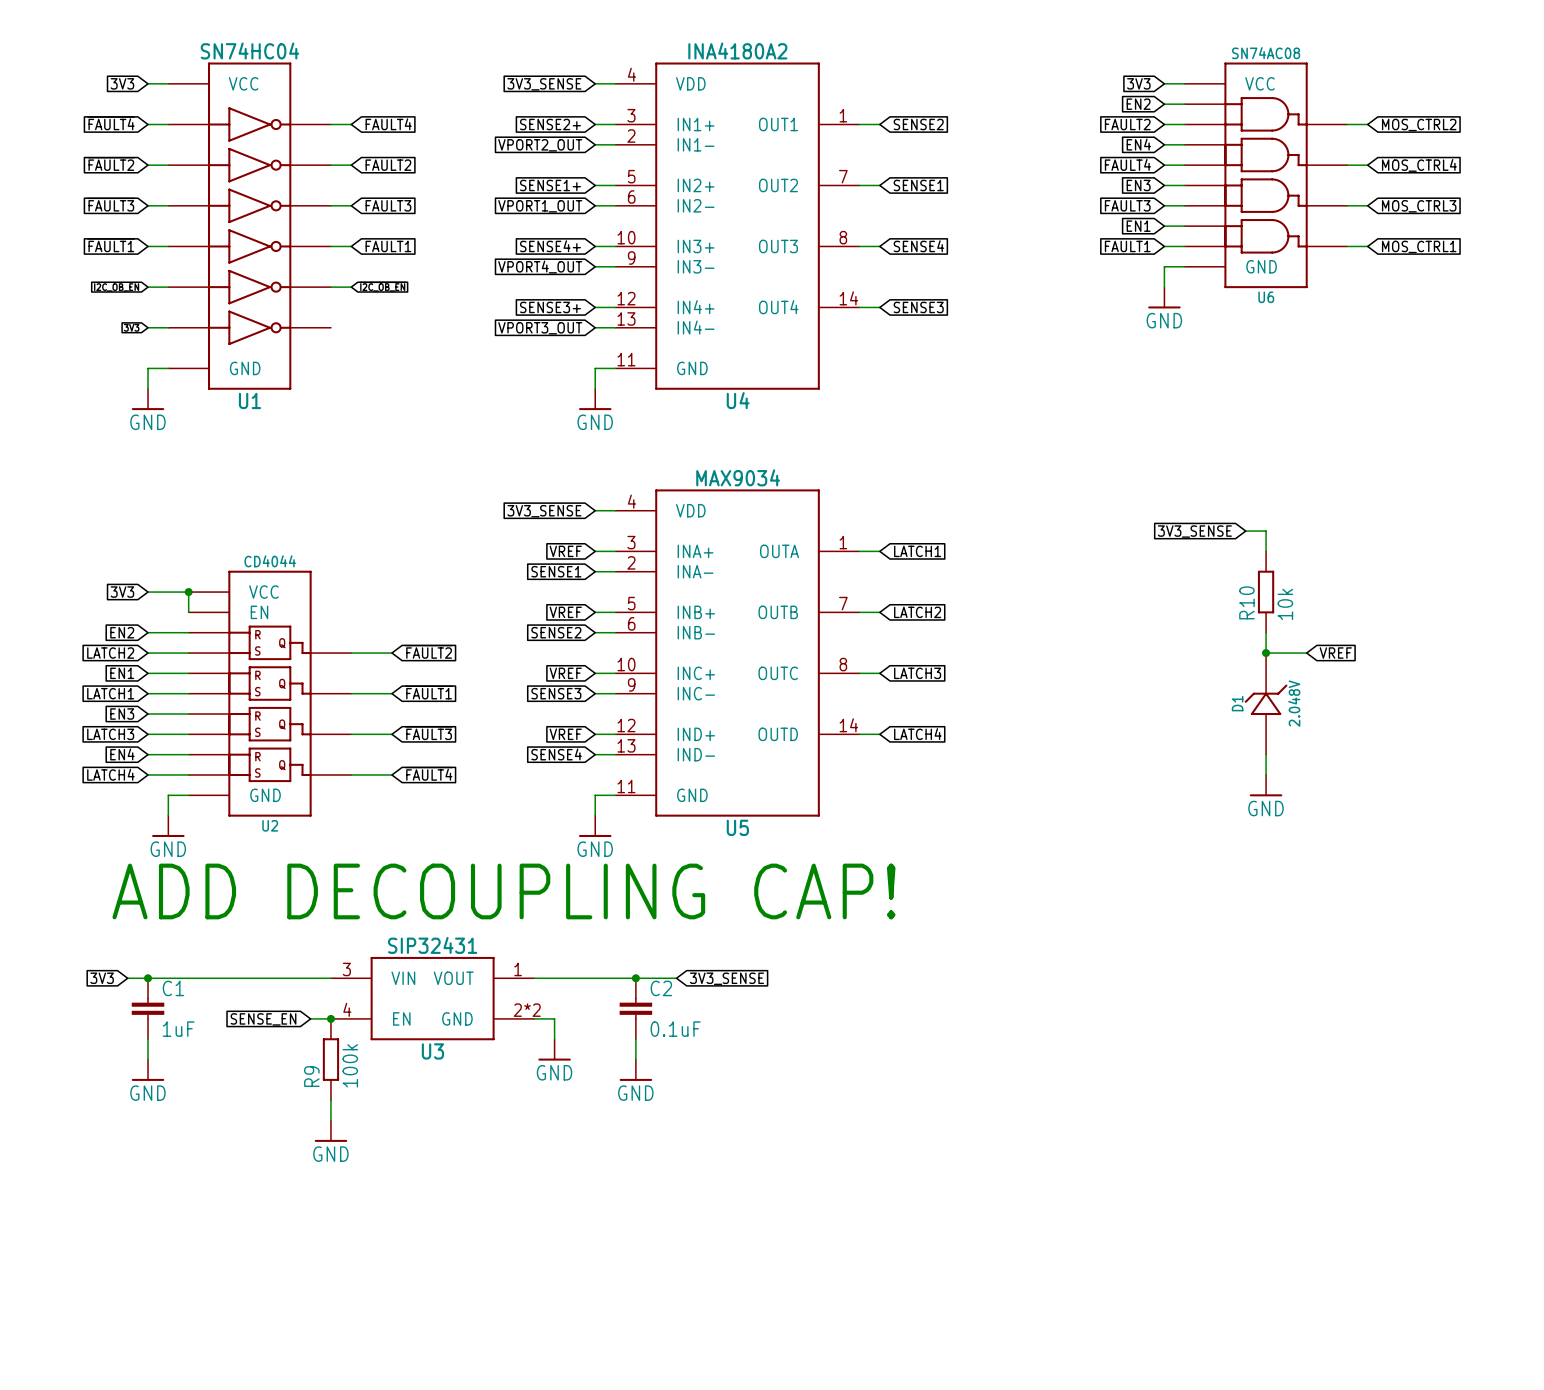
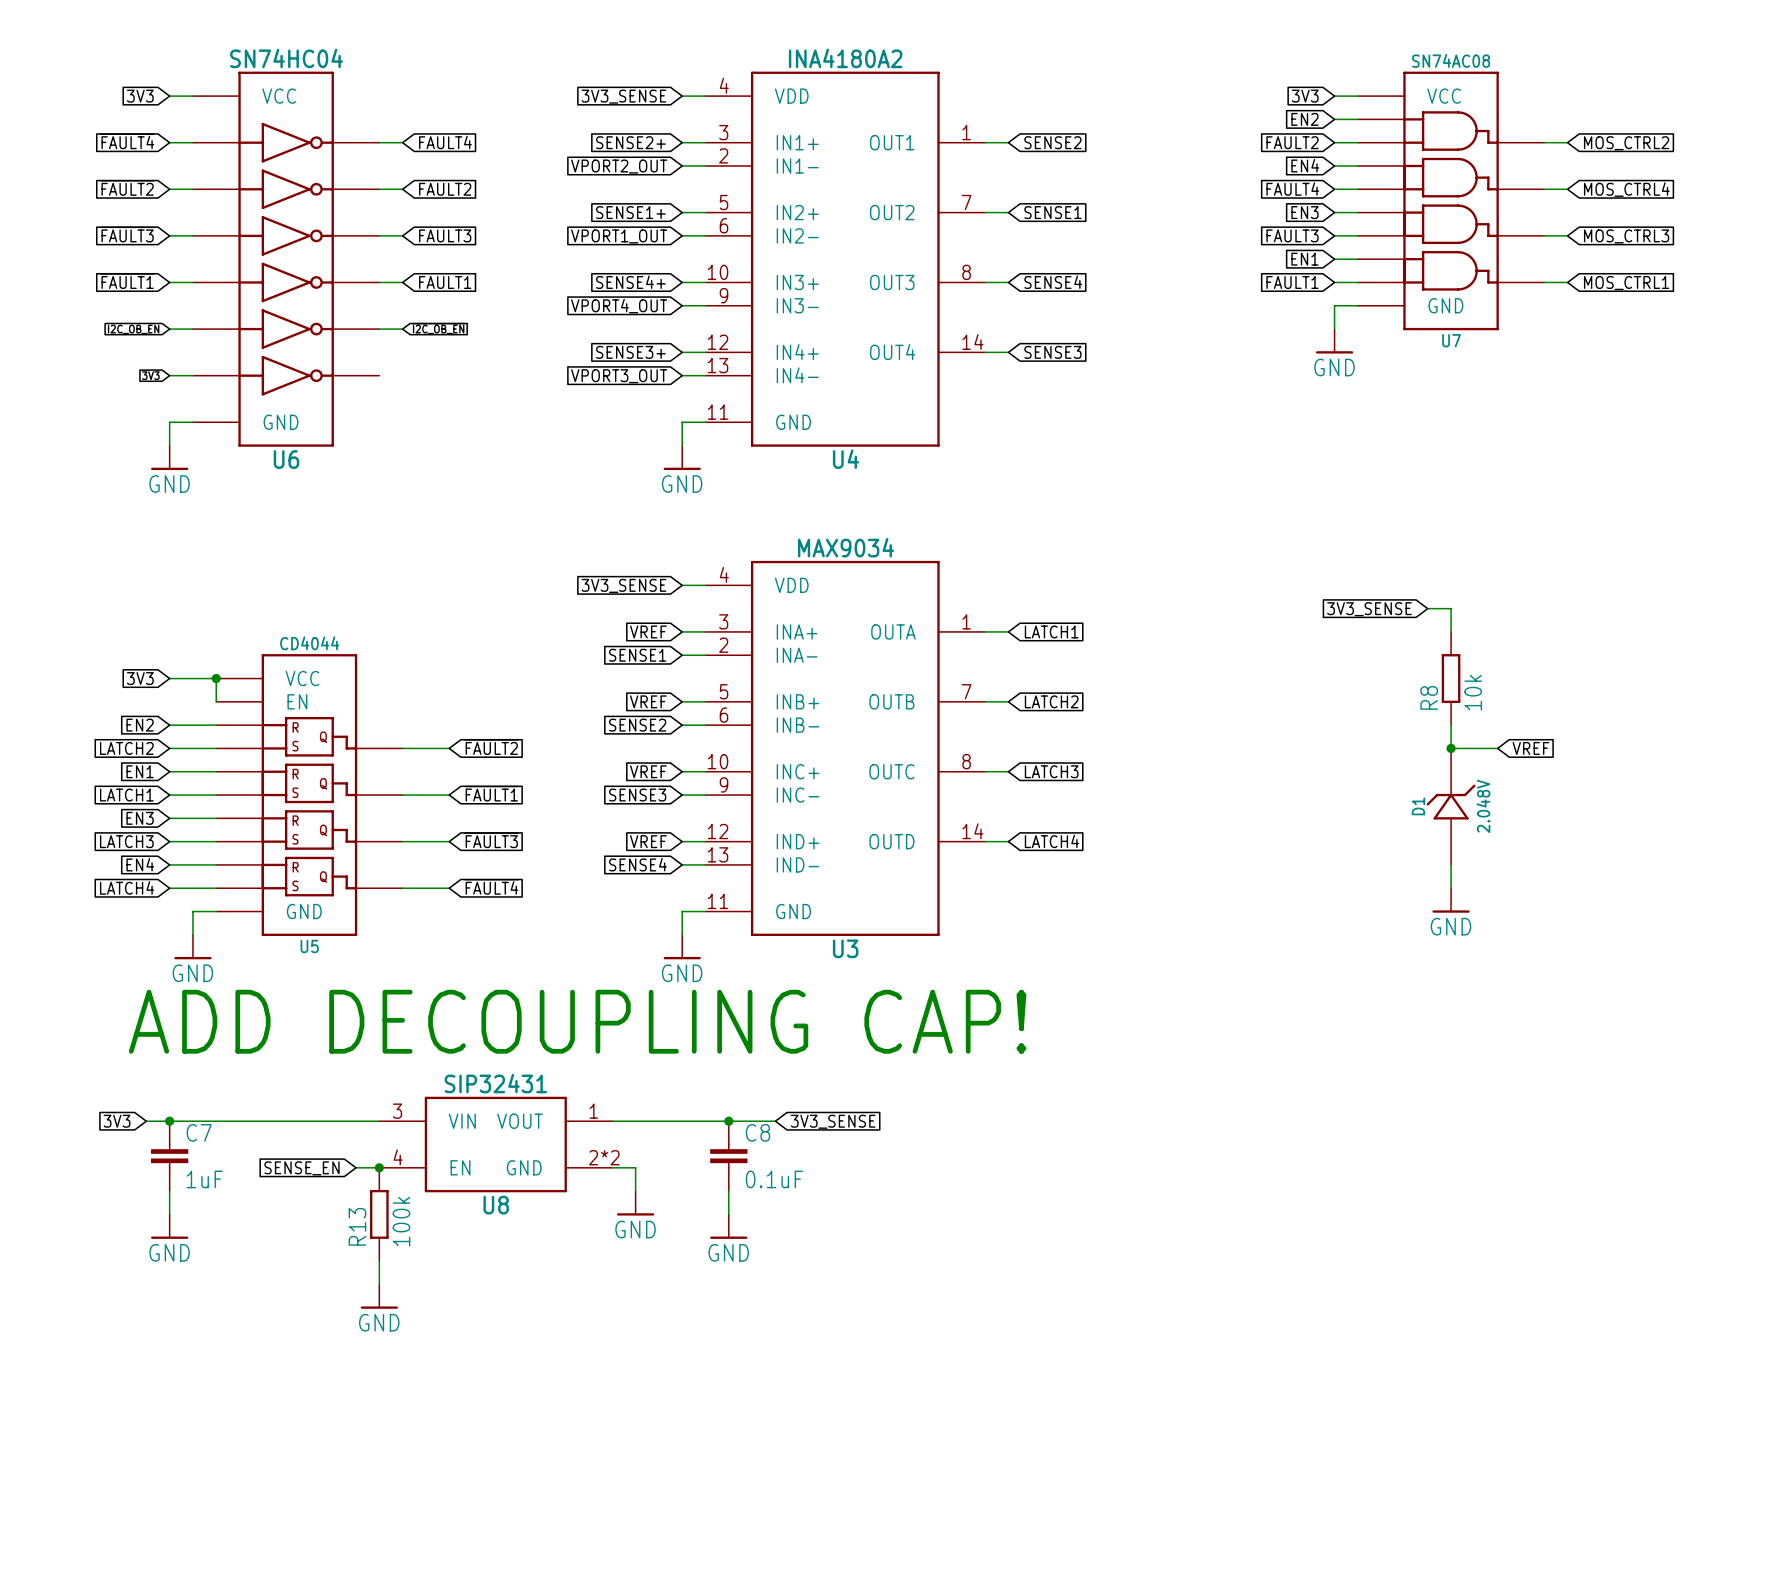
U6 name: U6 (1266, 297) -> U7 (1451, 340)
U1 name: U1 (249, 400) -> U6 (286, 459)
R10 name: R10 (1246, 602) -> R8 (1429, 697)
U2 name: U2 (270, 825) -> U5 (309, 946)
U5 name: U5 (737, 827) -> U3 (845, 948)
C1 name: C1 (173, 988) -> C7 (199, 1132)
C2 name: C2 (661, 988) -> C8 (757, 1132)
U3 name: U3 (432, 1051) -> U8 (496, 1205)
R9 name: R9 (311, 1076) -> R13 (357, 1226)

